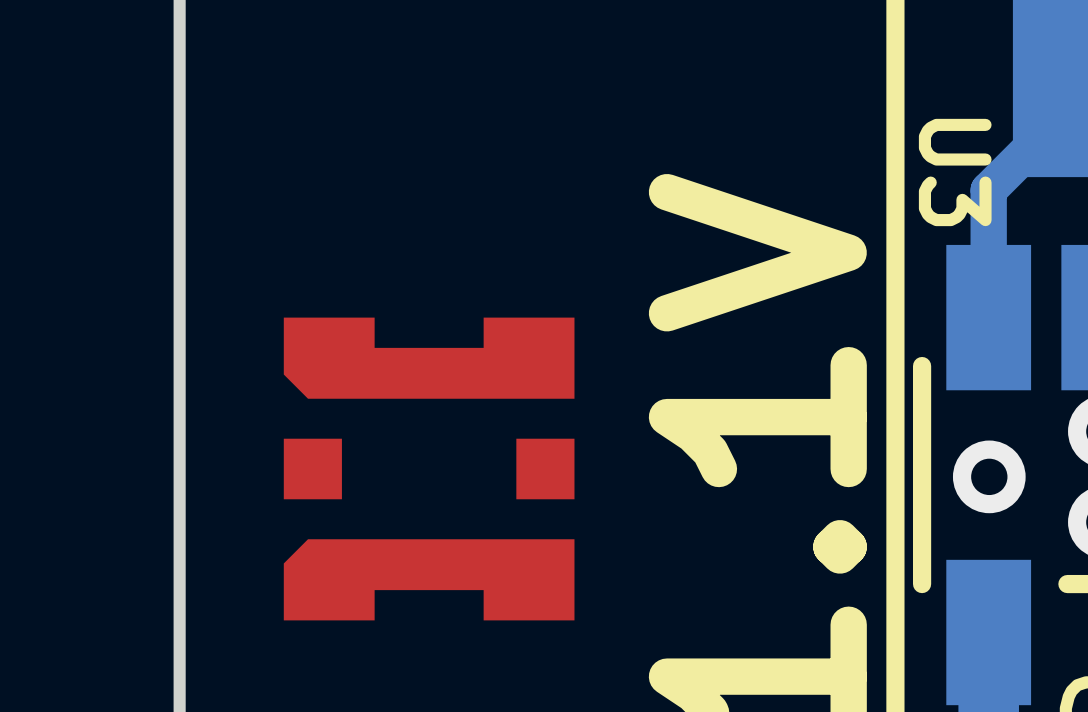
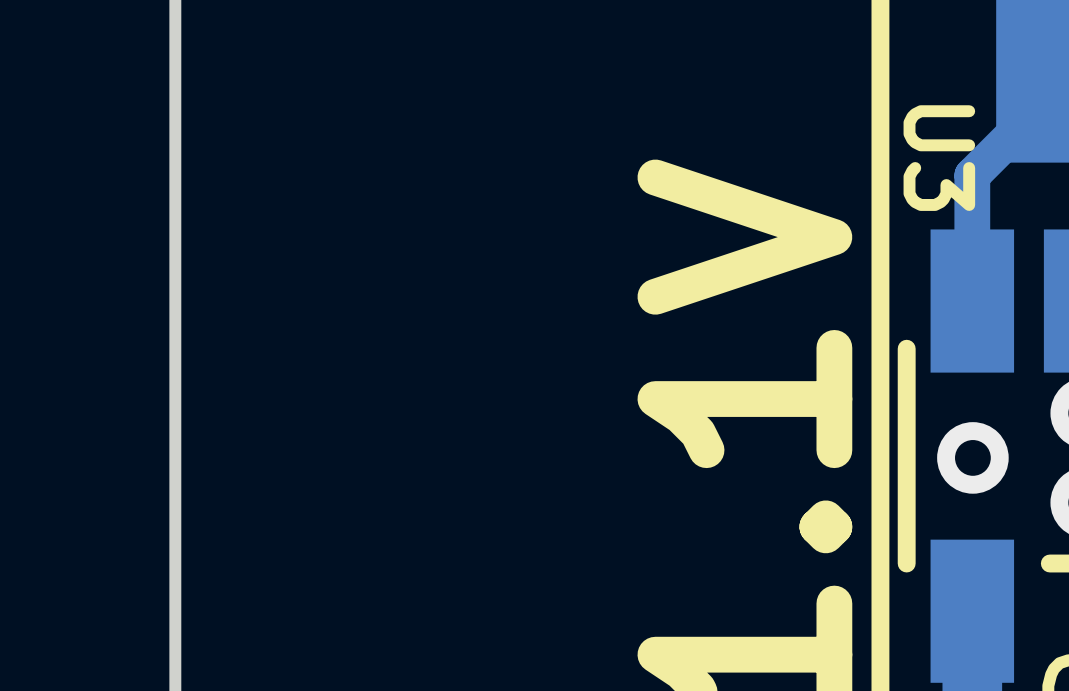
part: (429, 468) -> none

